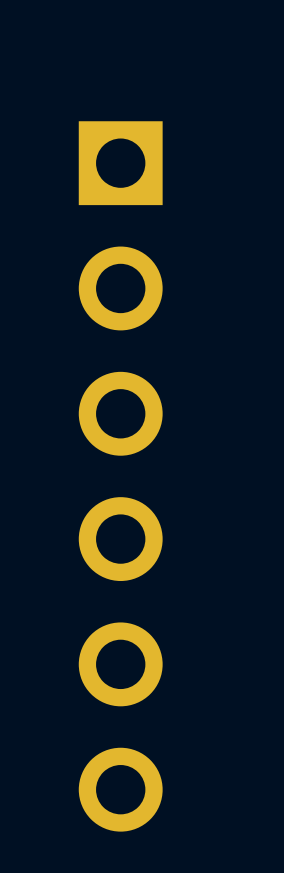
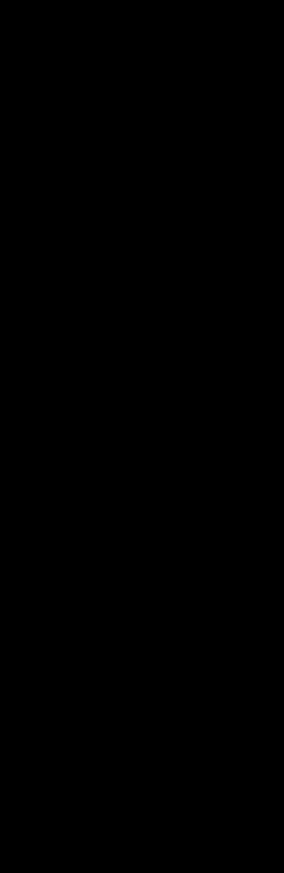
part: (120, 476) -> none

